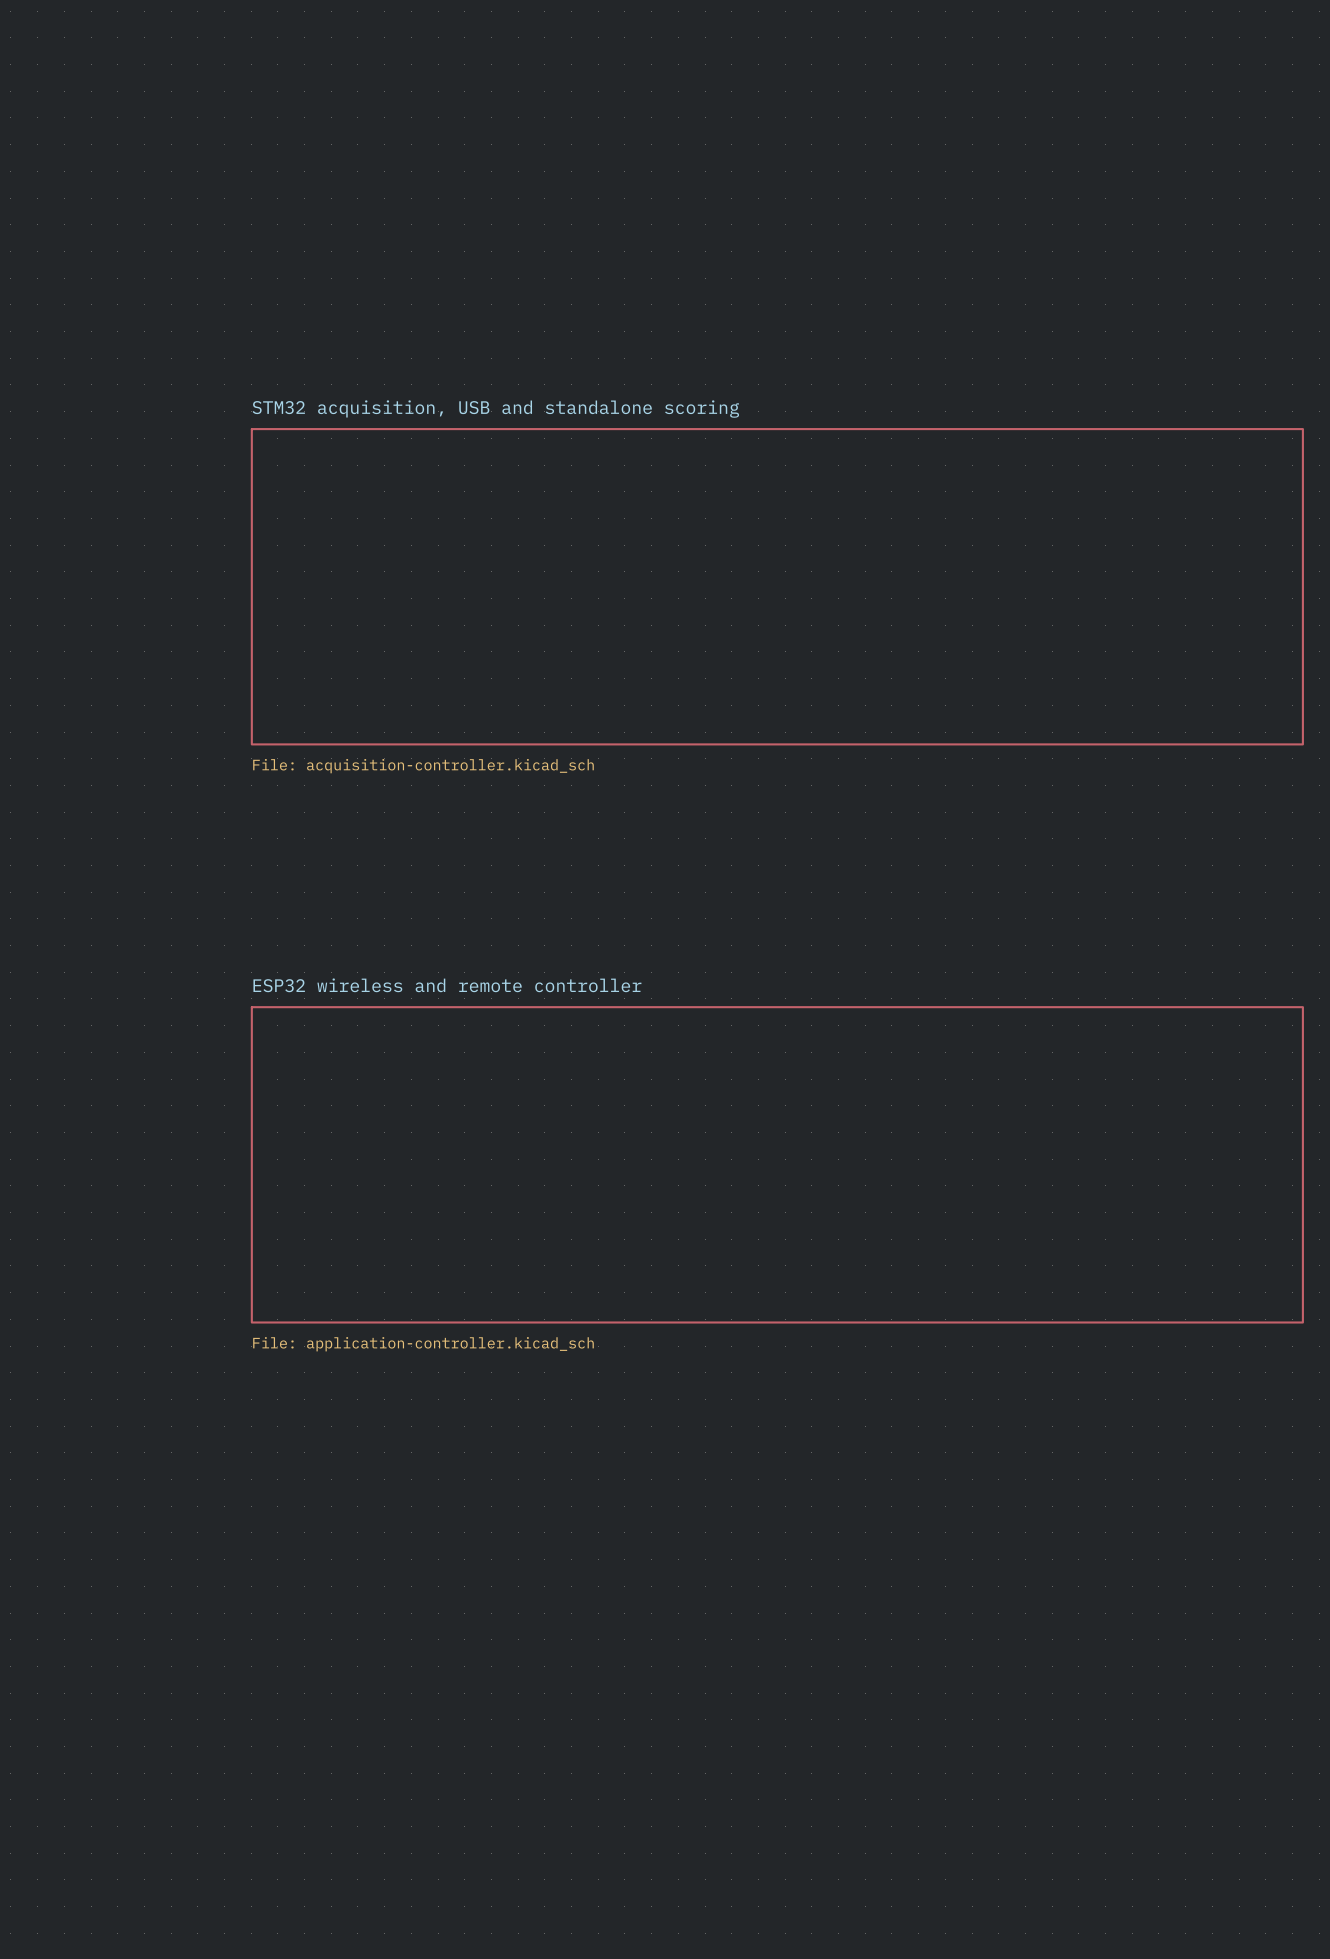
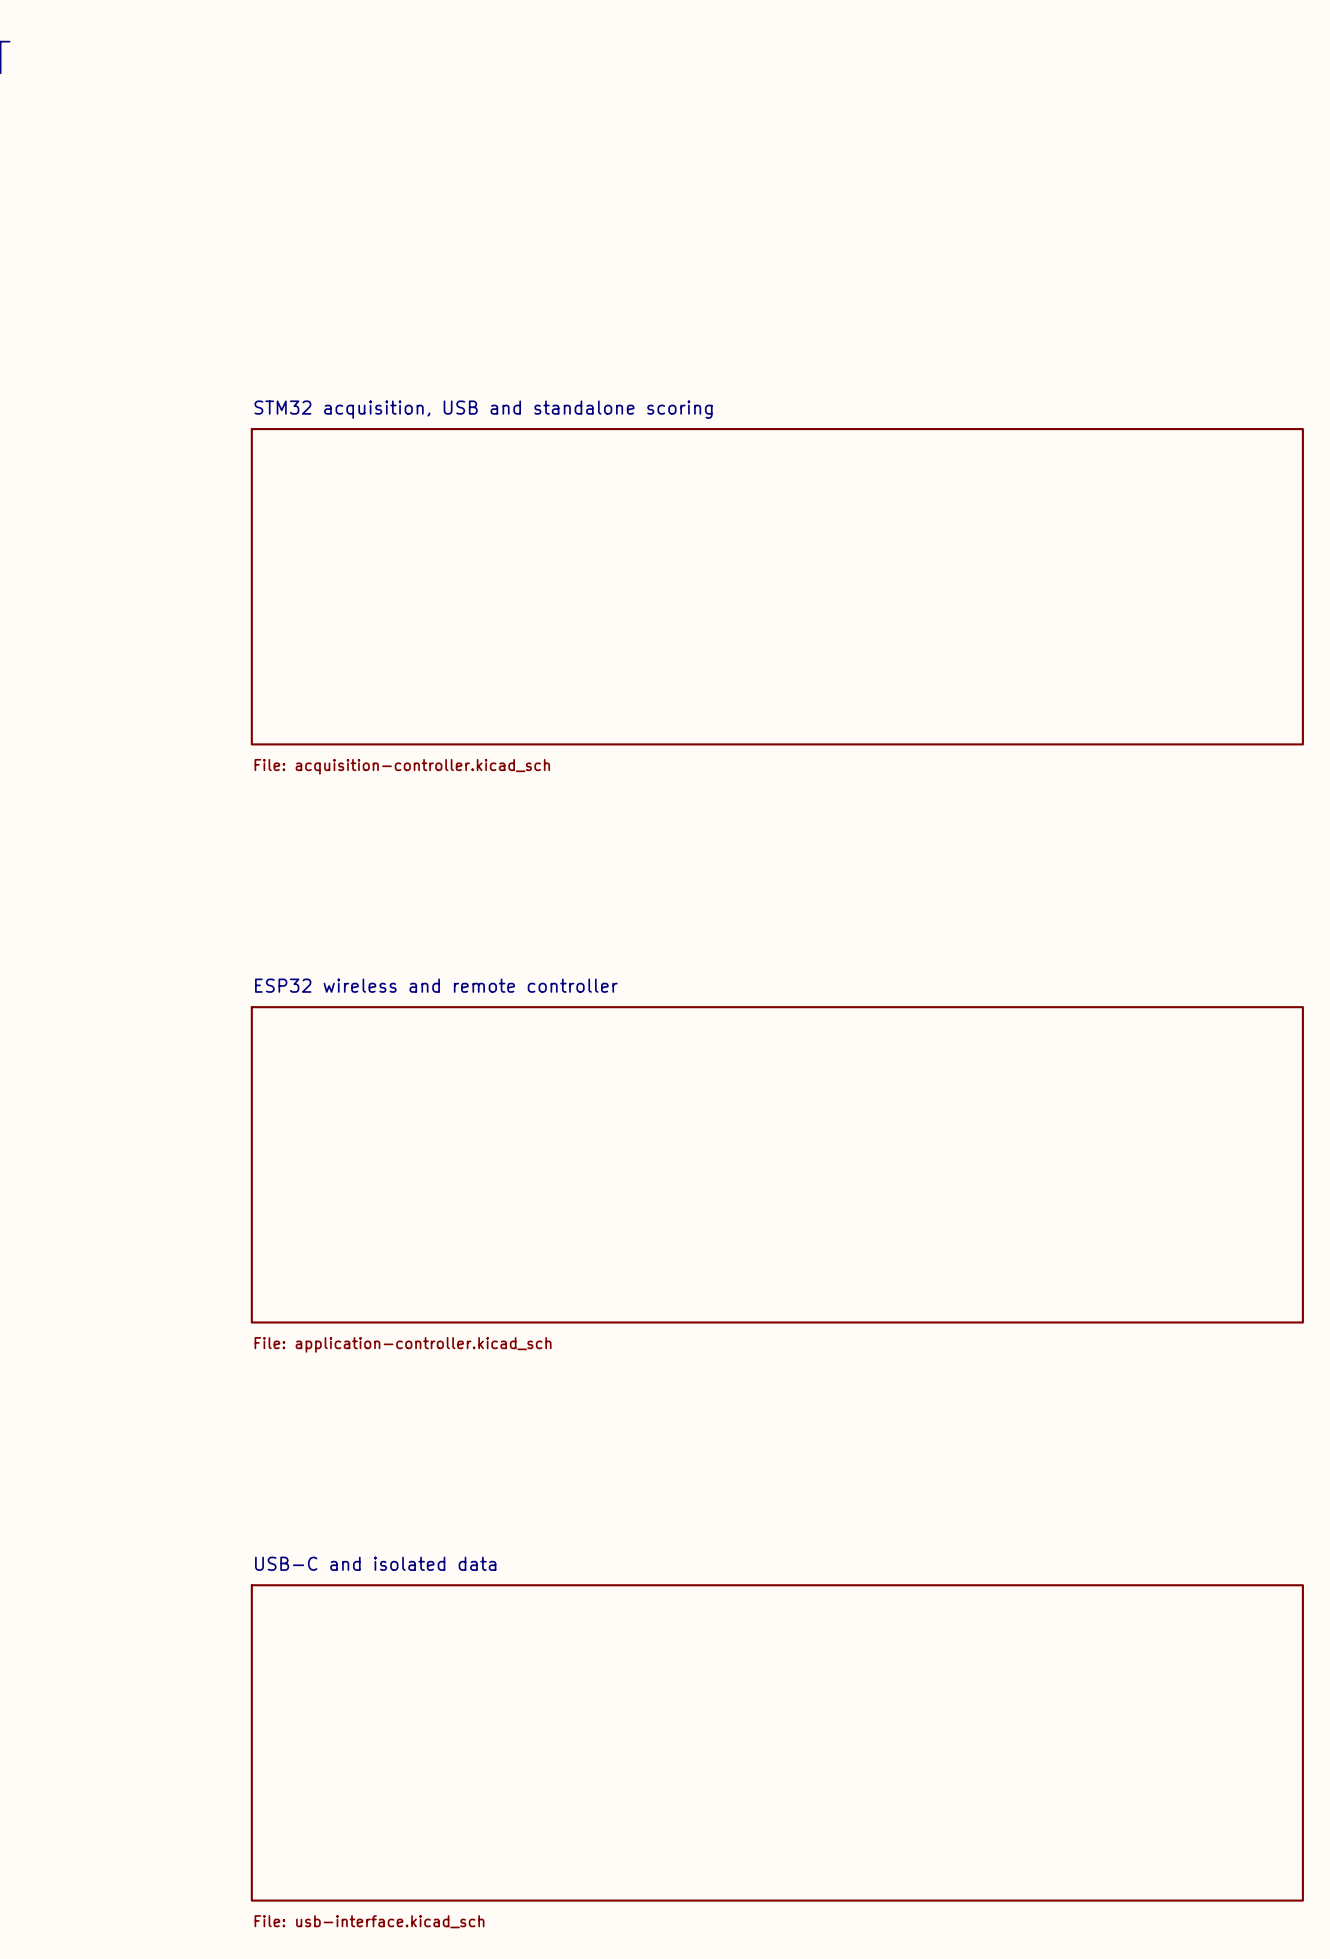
sheet USB-C and isolated data: none -> File: usb-interface.kicad_sch (777, 1742)

